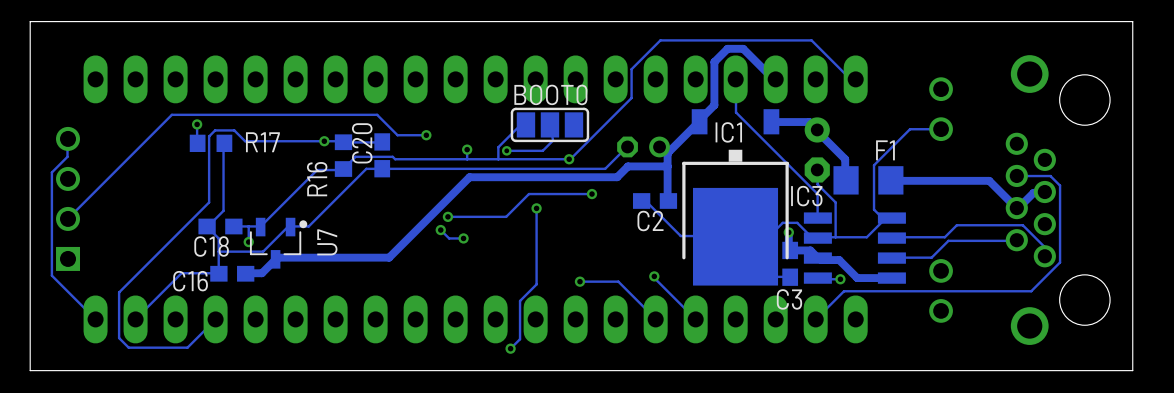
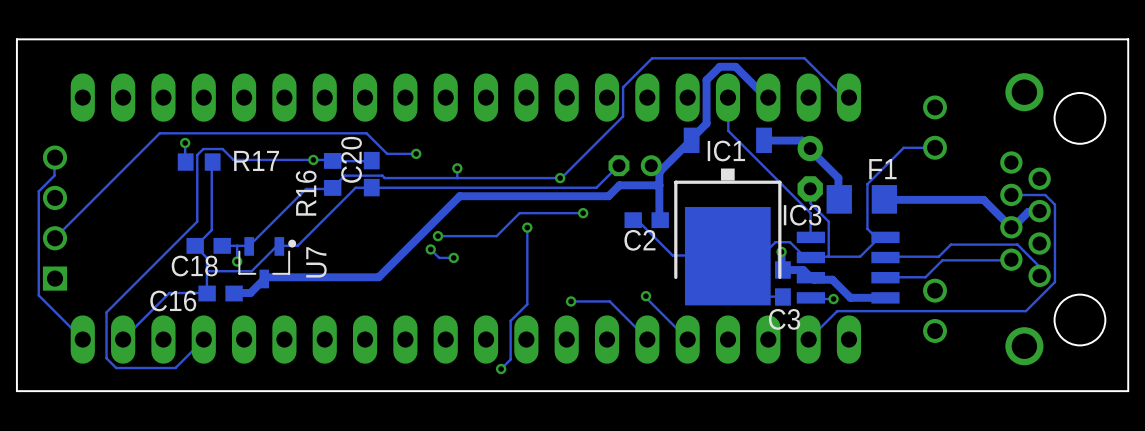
track: (525, 124) (519, 125) (498, 147) (498, 159) -> none
track: (549, 124) (553, 140) (542, 150) (506, 150) -> none
BOOT0: (549, 124) -> none
via: (506, 150) -> none

